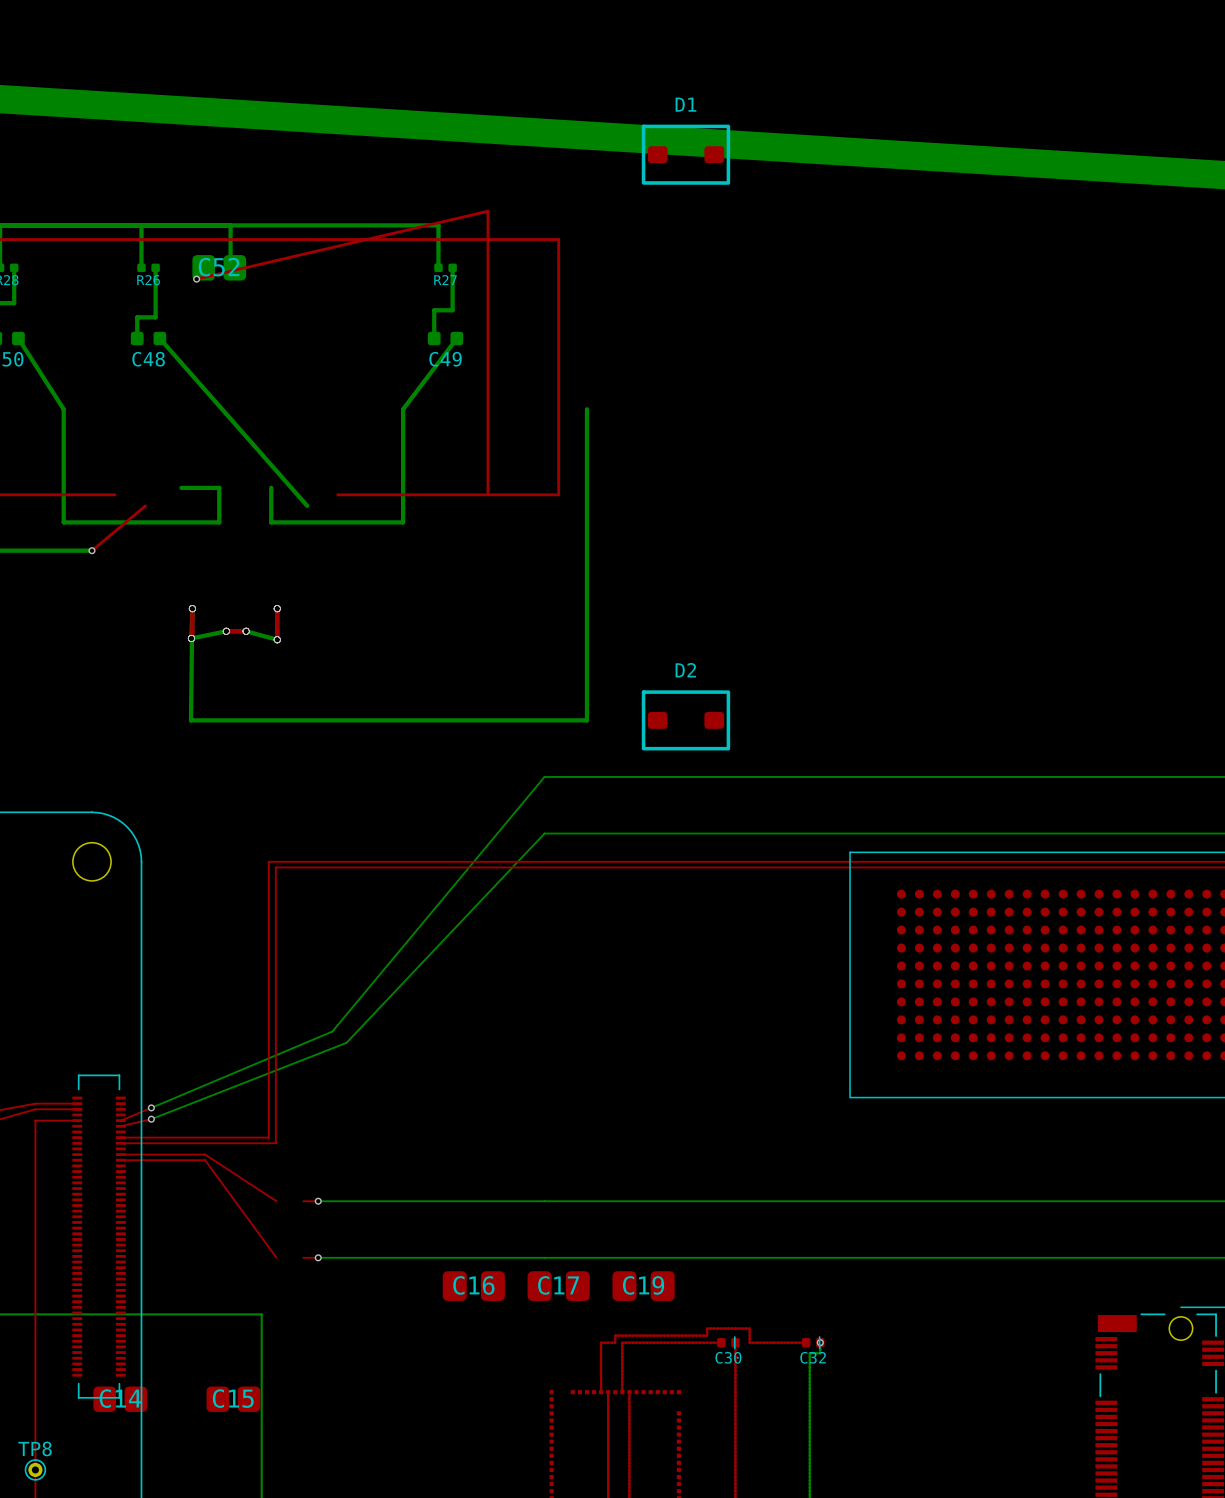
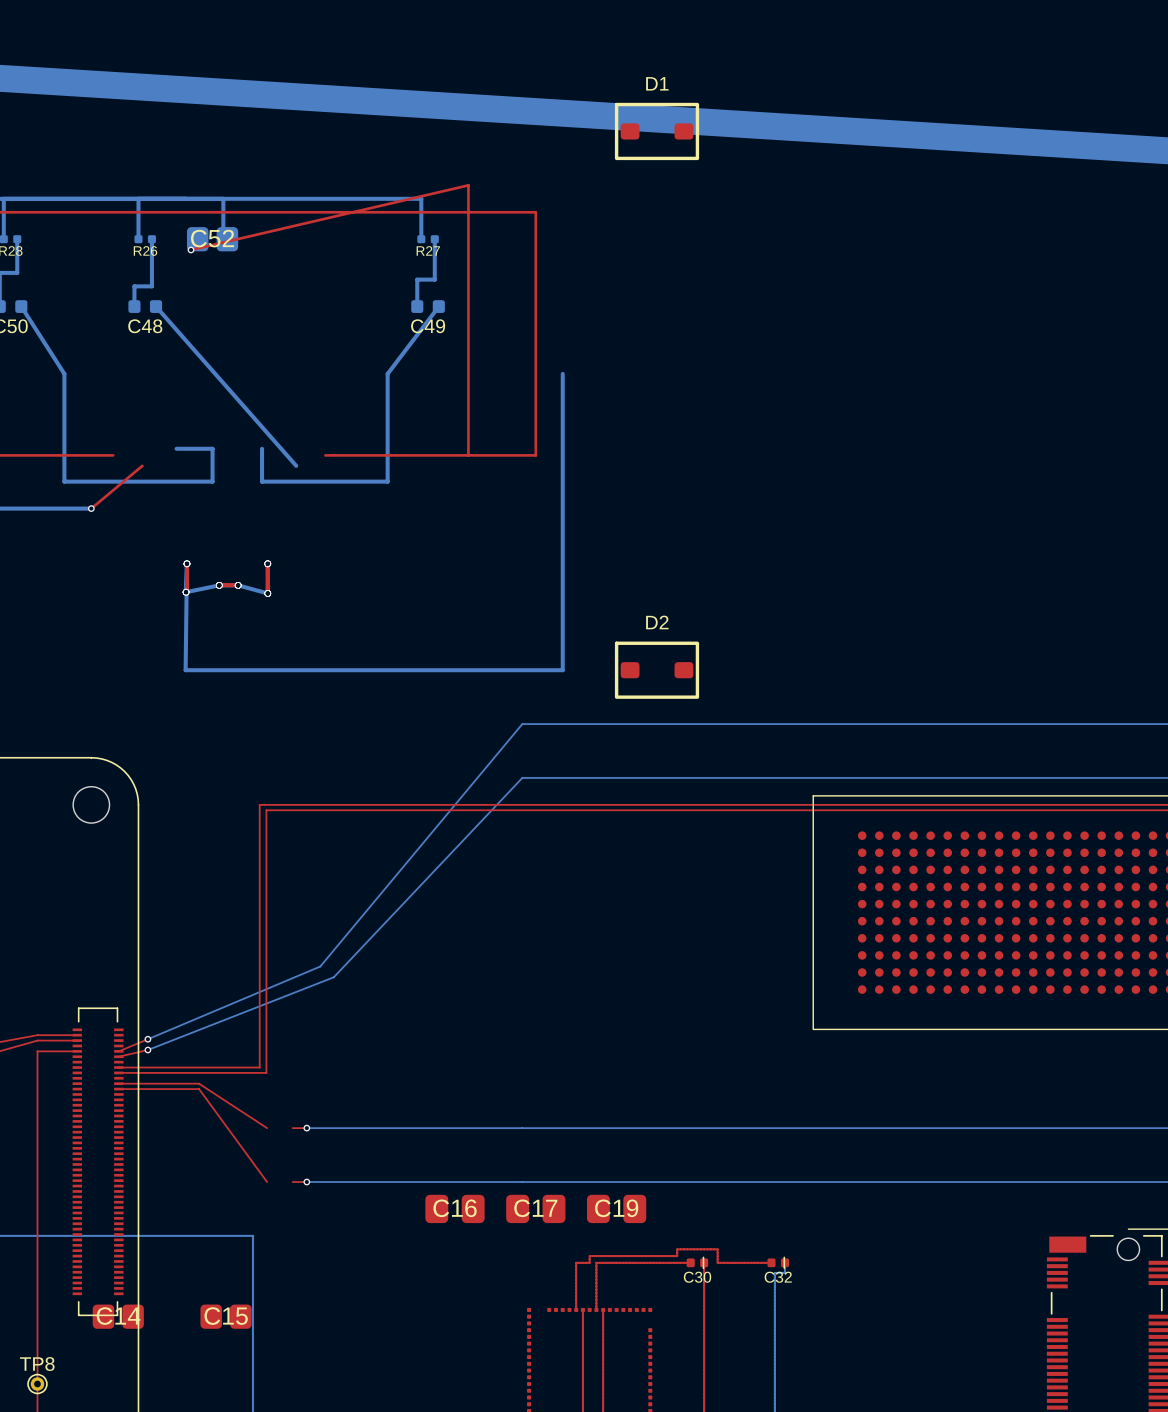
via: (820, 1342) -> none

